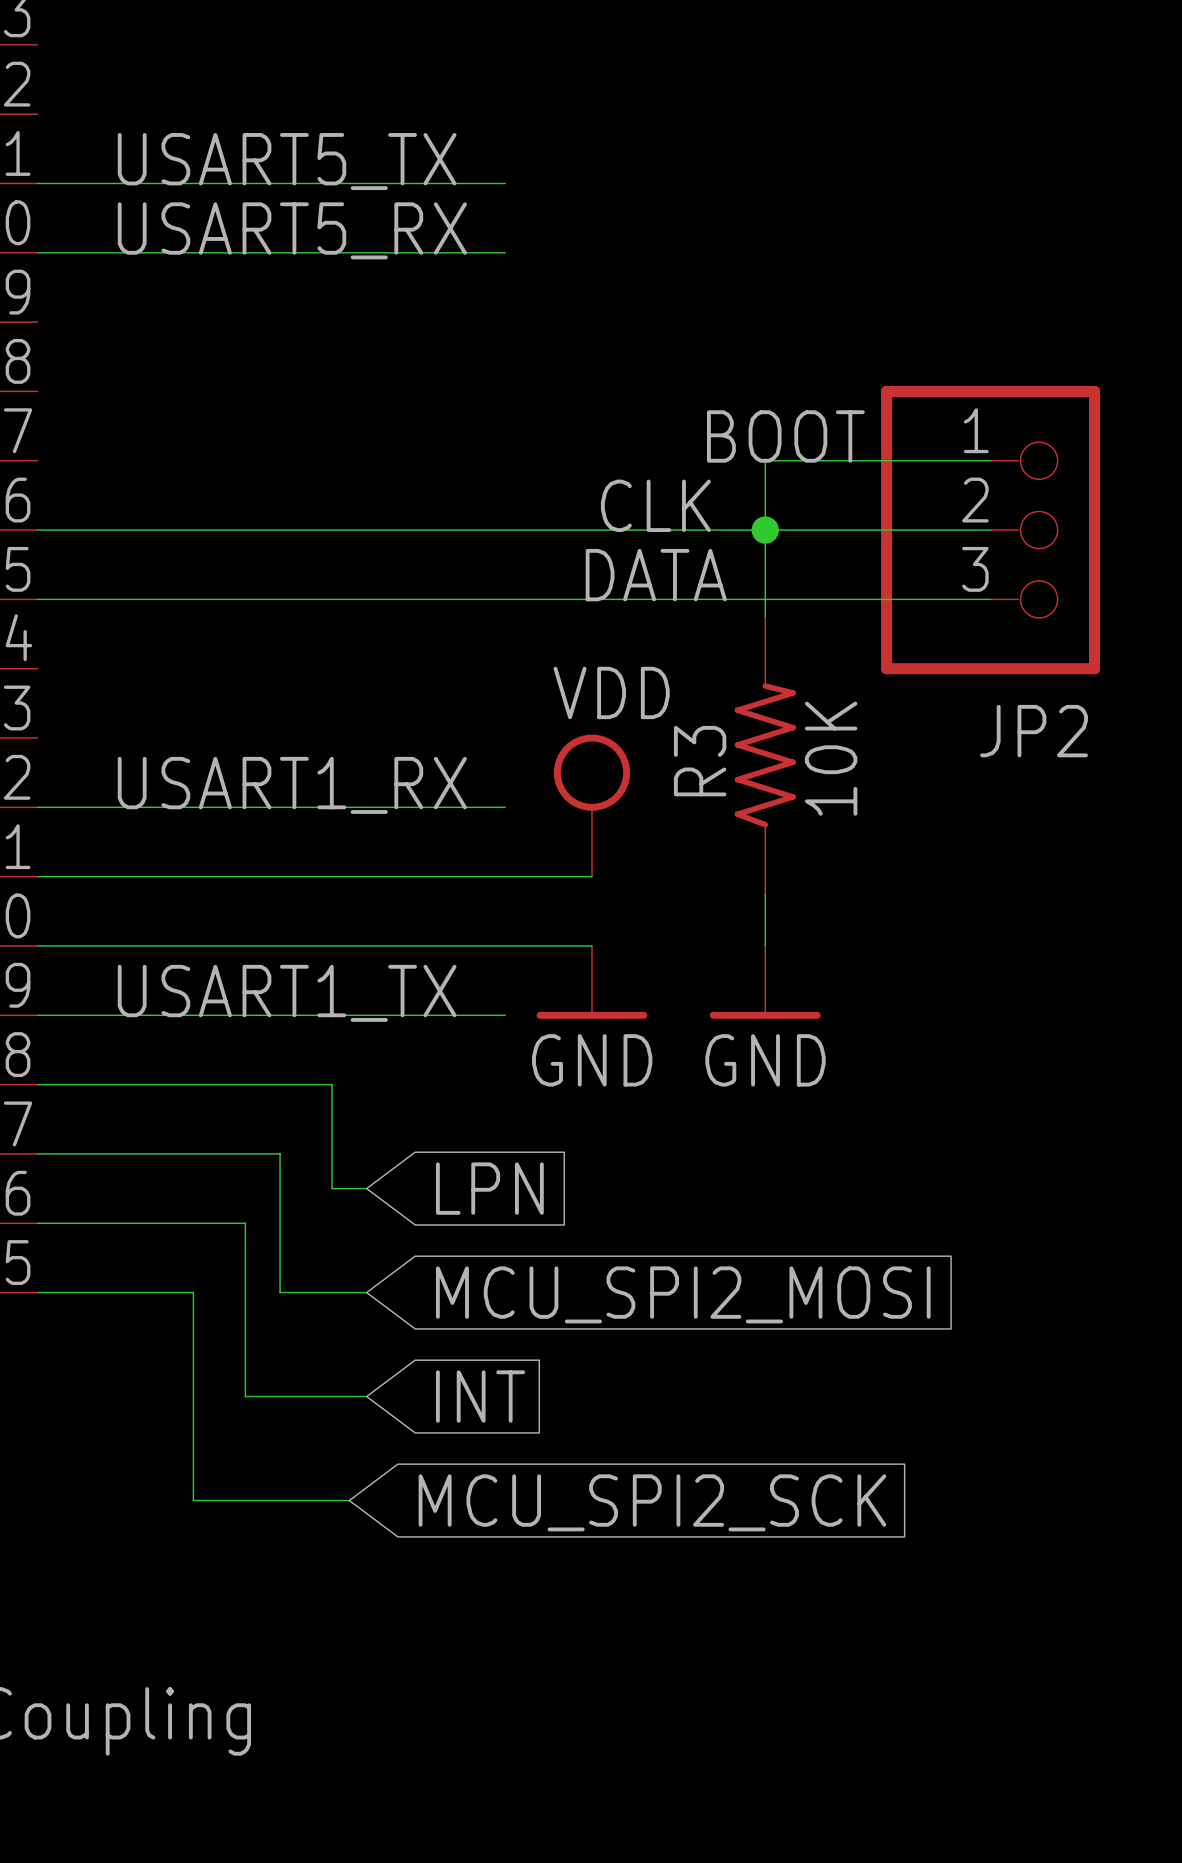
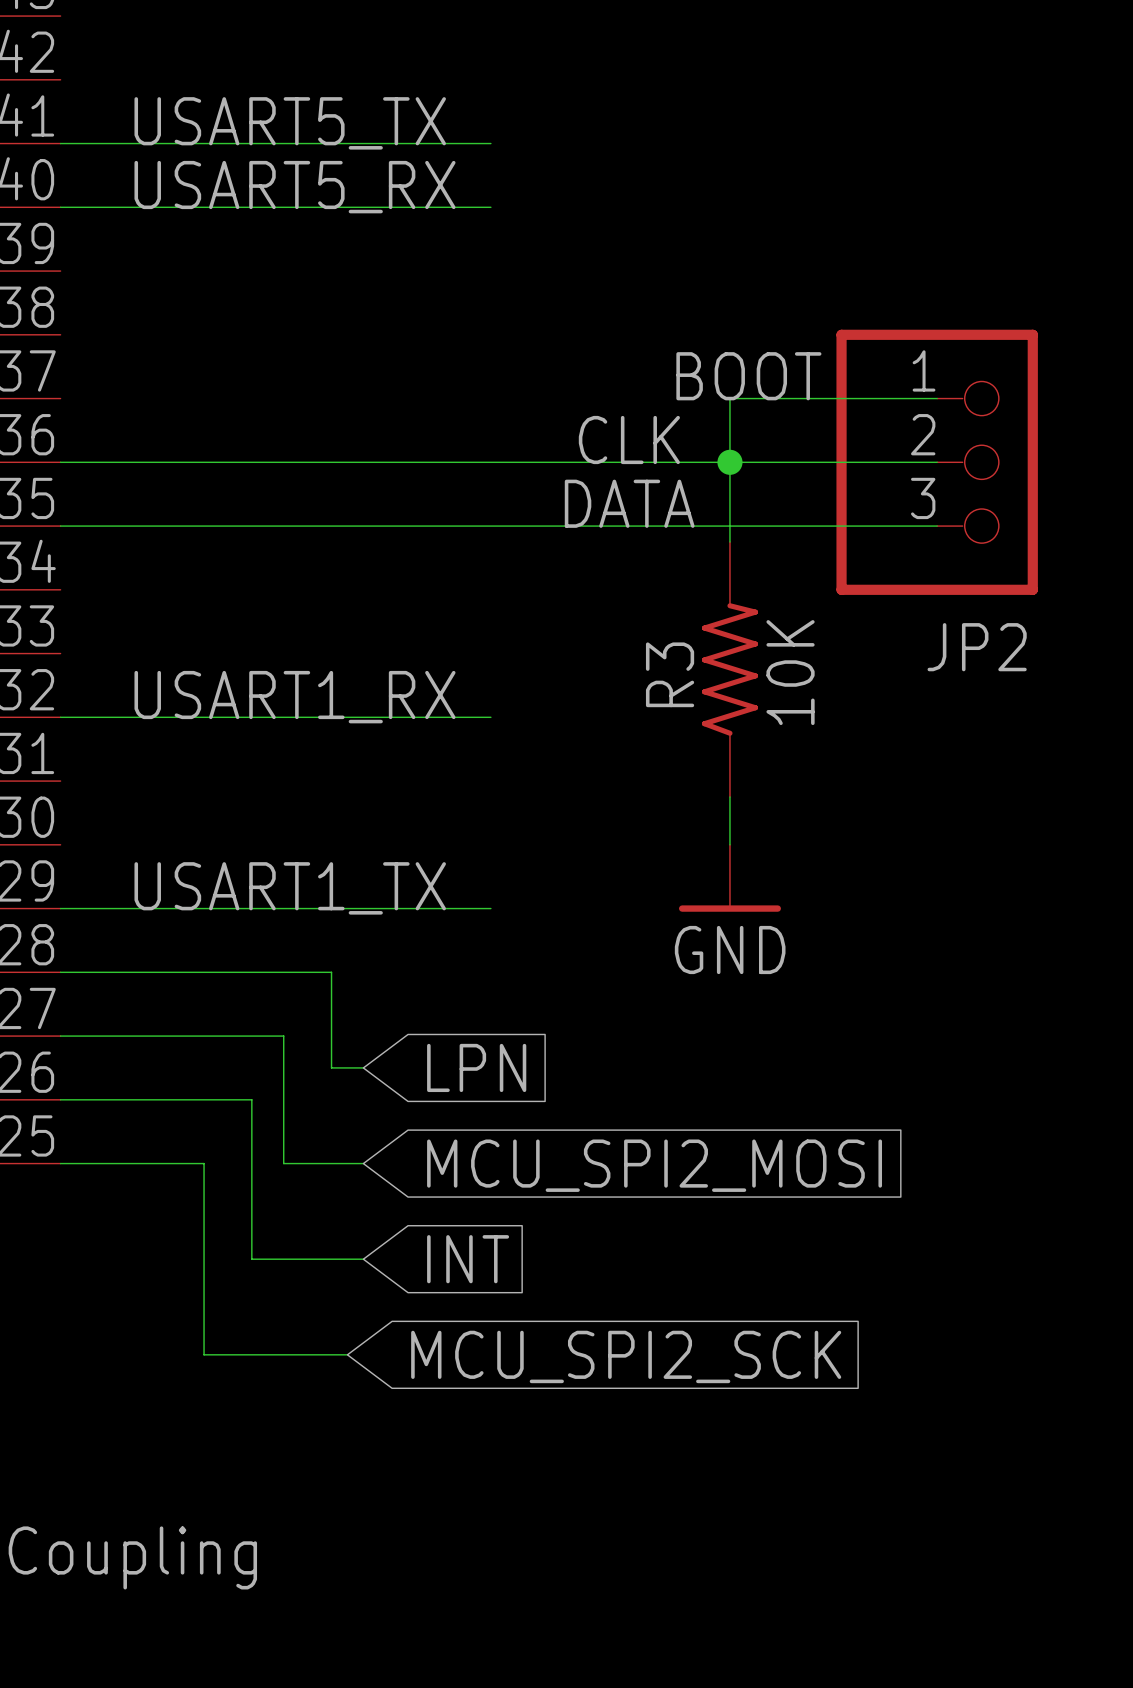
power symbol: VDD (591, 805) -> none
wire: (37, 876) (591, 876) -> none
wire: (37, 945) (591, 945) -> none
power symbol: GND (591, 982) -> none

